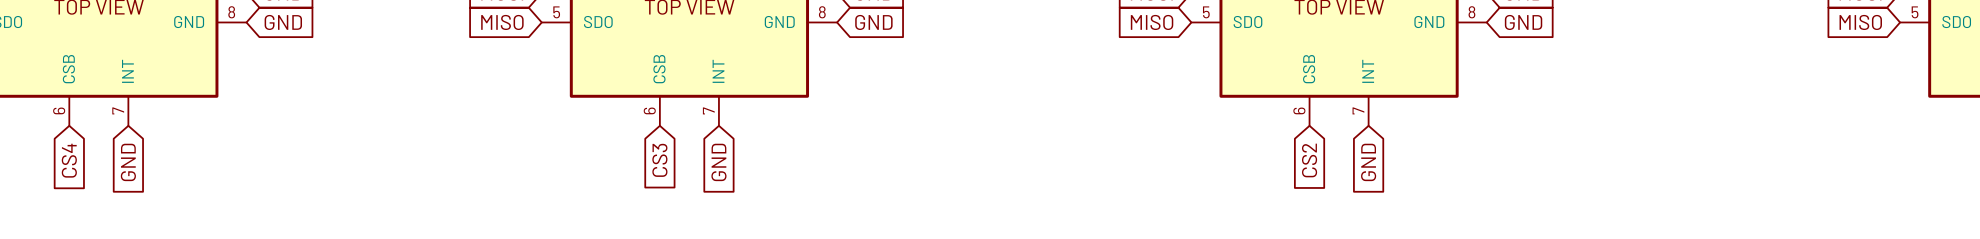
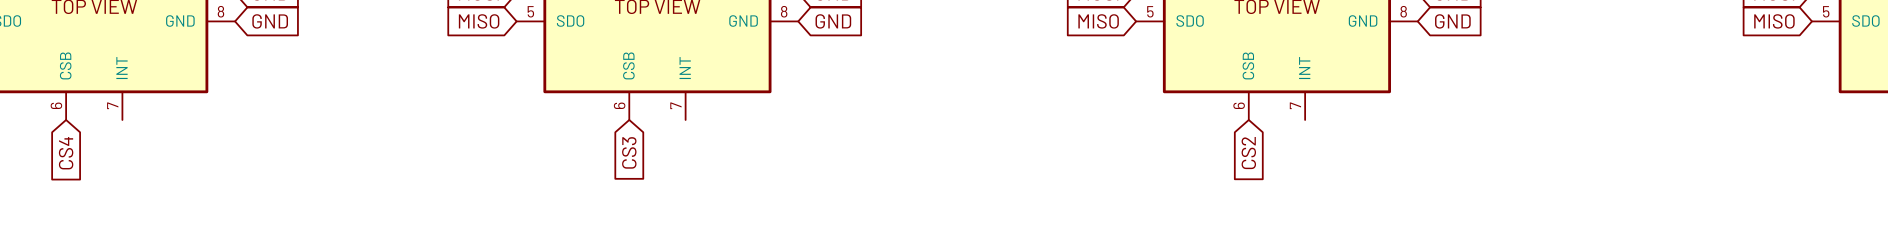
global label: GND (128, 162) -> none
global label: GND (718, 162) -> none
global label: GND (1368, 162) -> none

